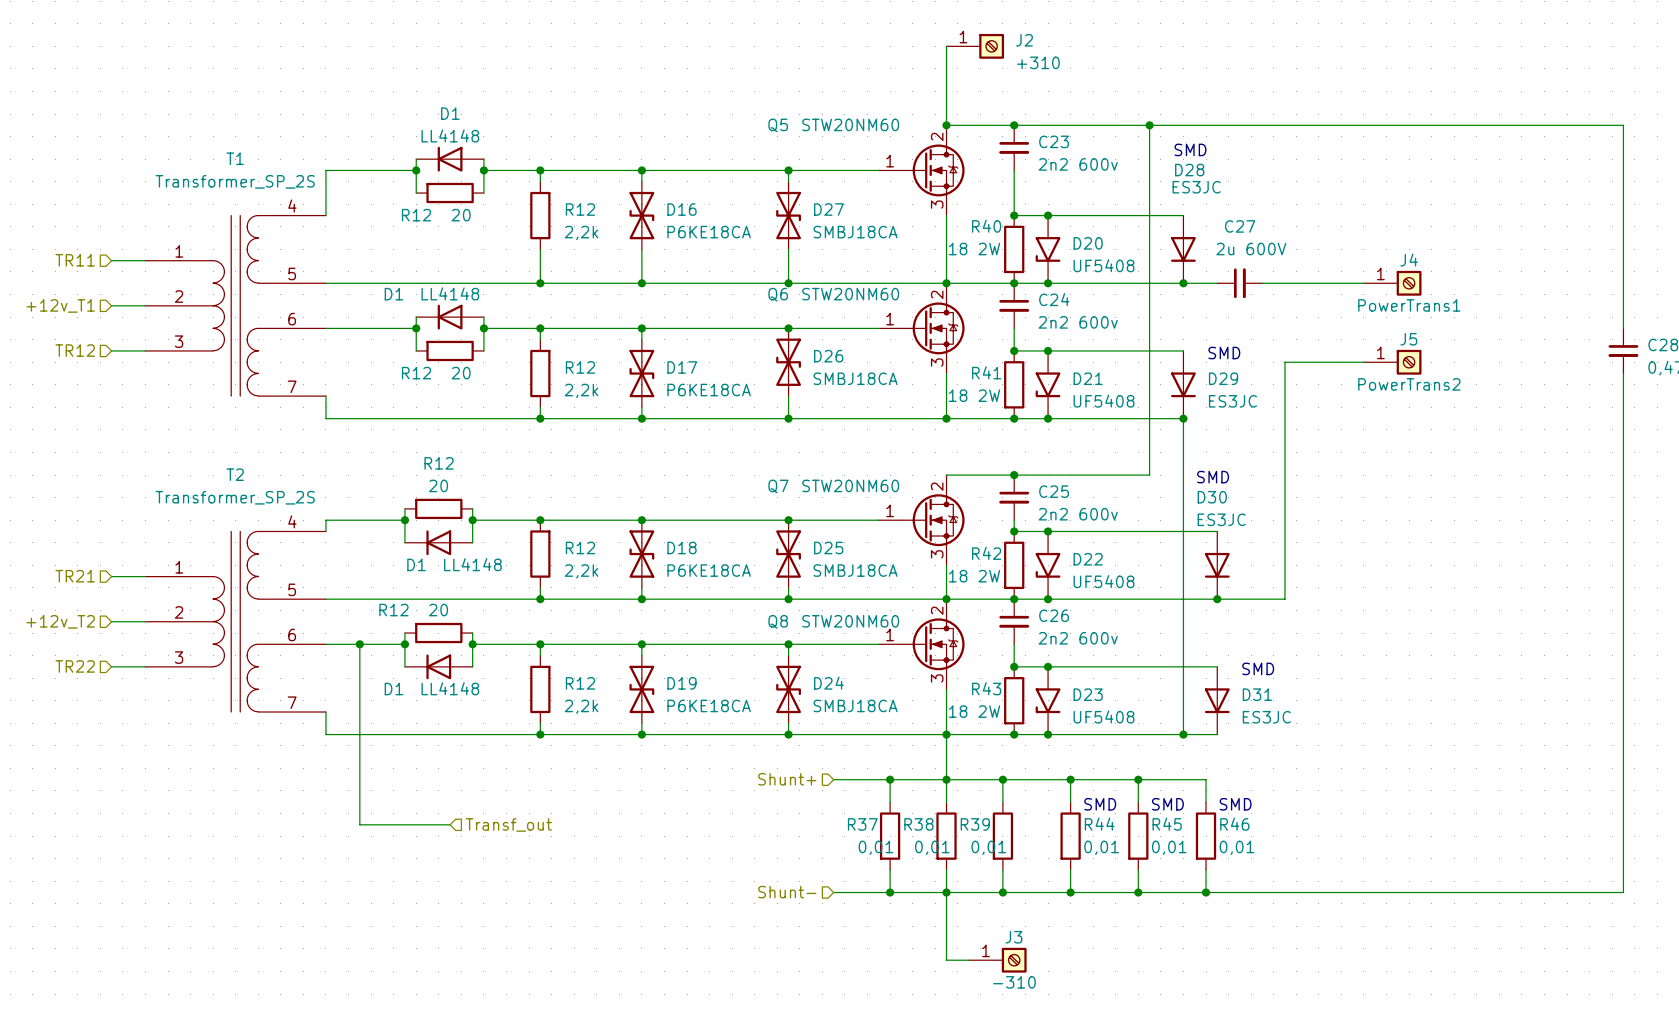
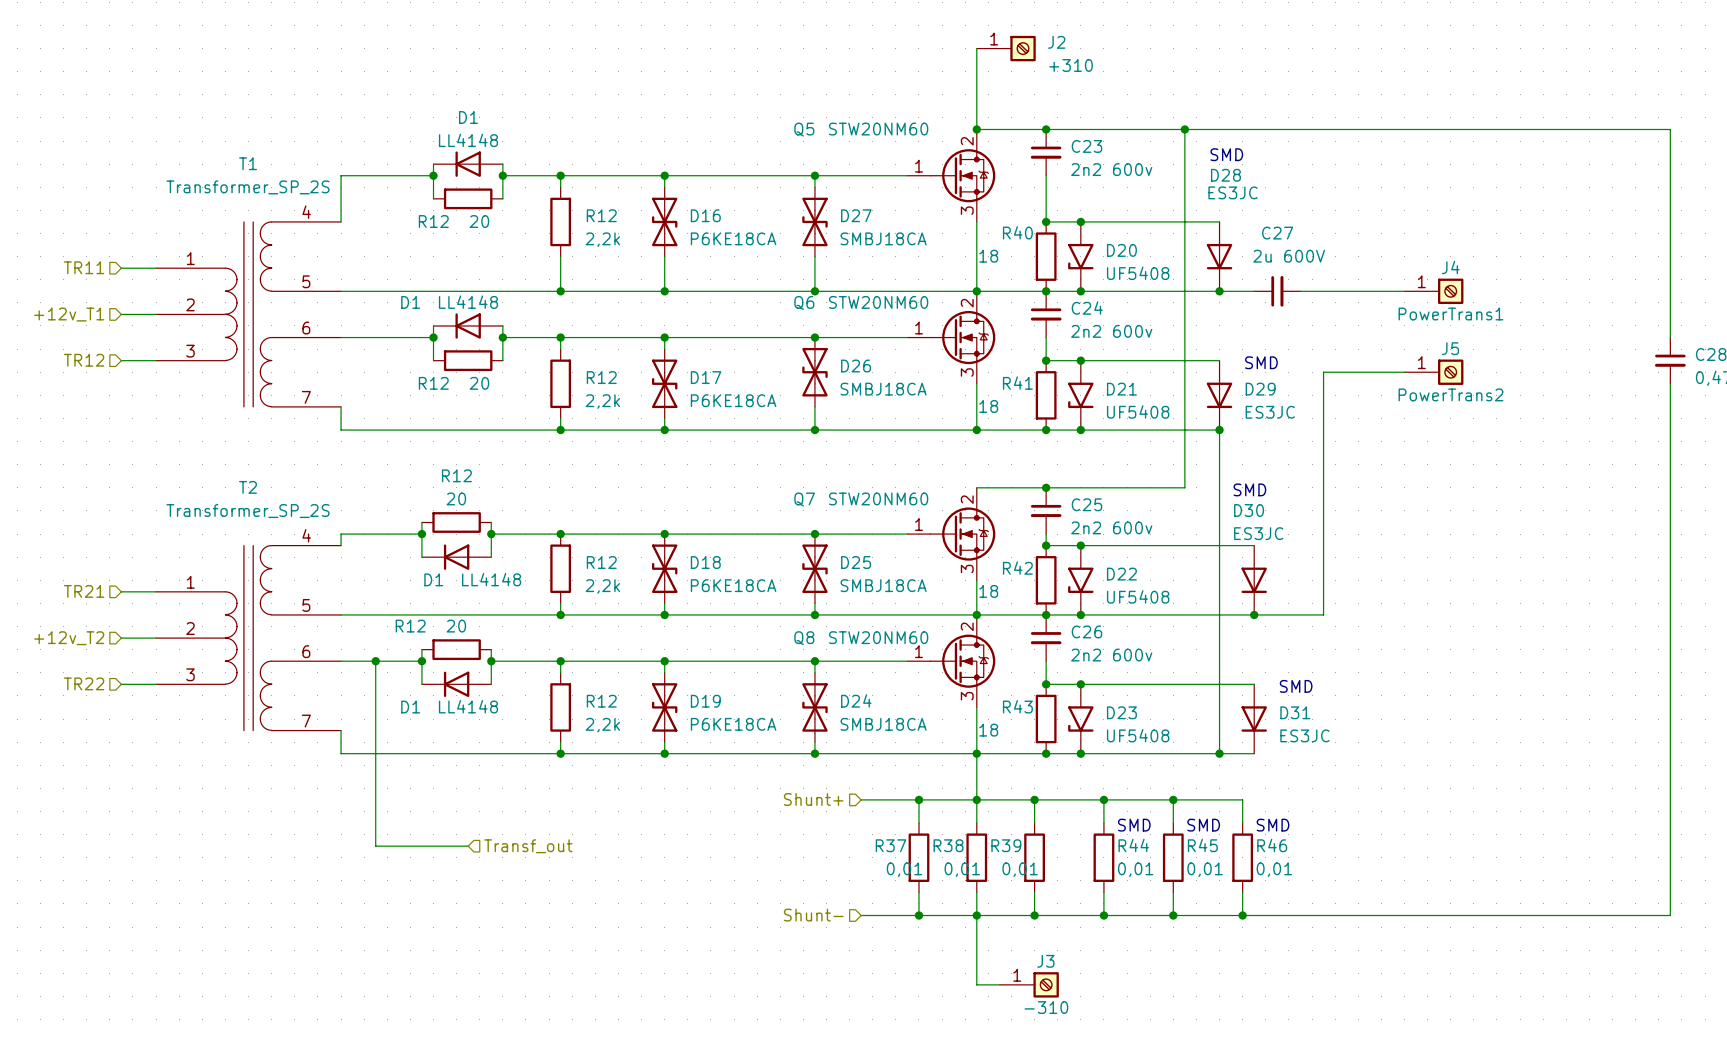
R40 value: 18 2W (974, 249) -> 18 (988, 256)
R41 value: 18 2W (974, 395) -> 18 (988, 406)
R42 value: 18 2W (974, 576) -> 18 (988, 591)
R43 value: 18 2W (974, 711) -> 18 (988, 730)

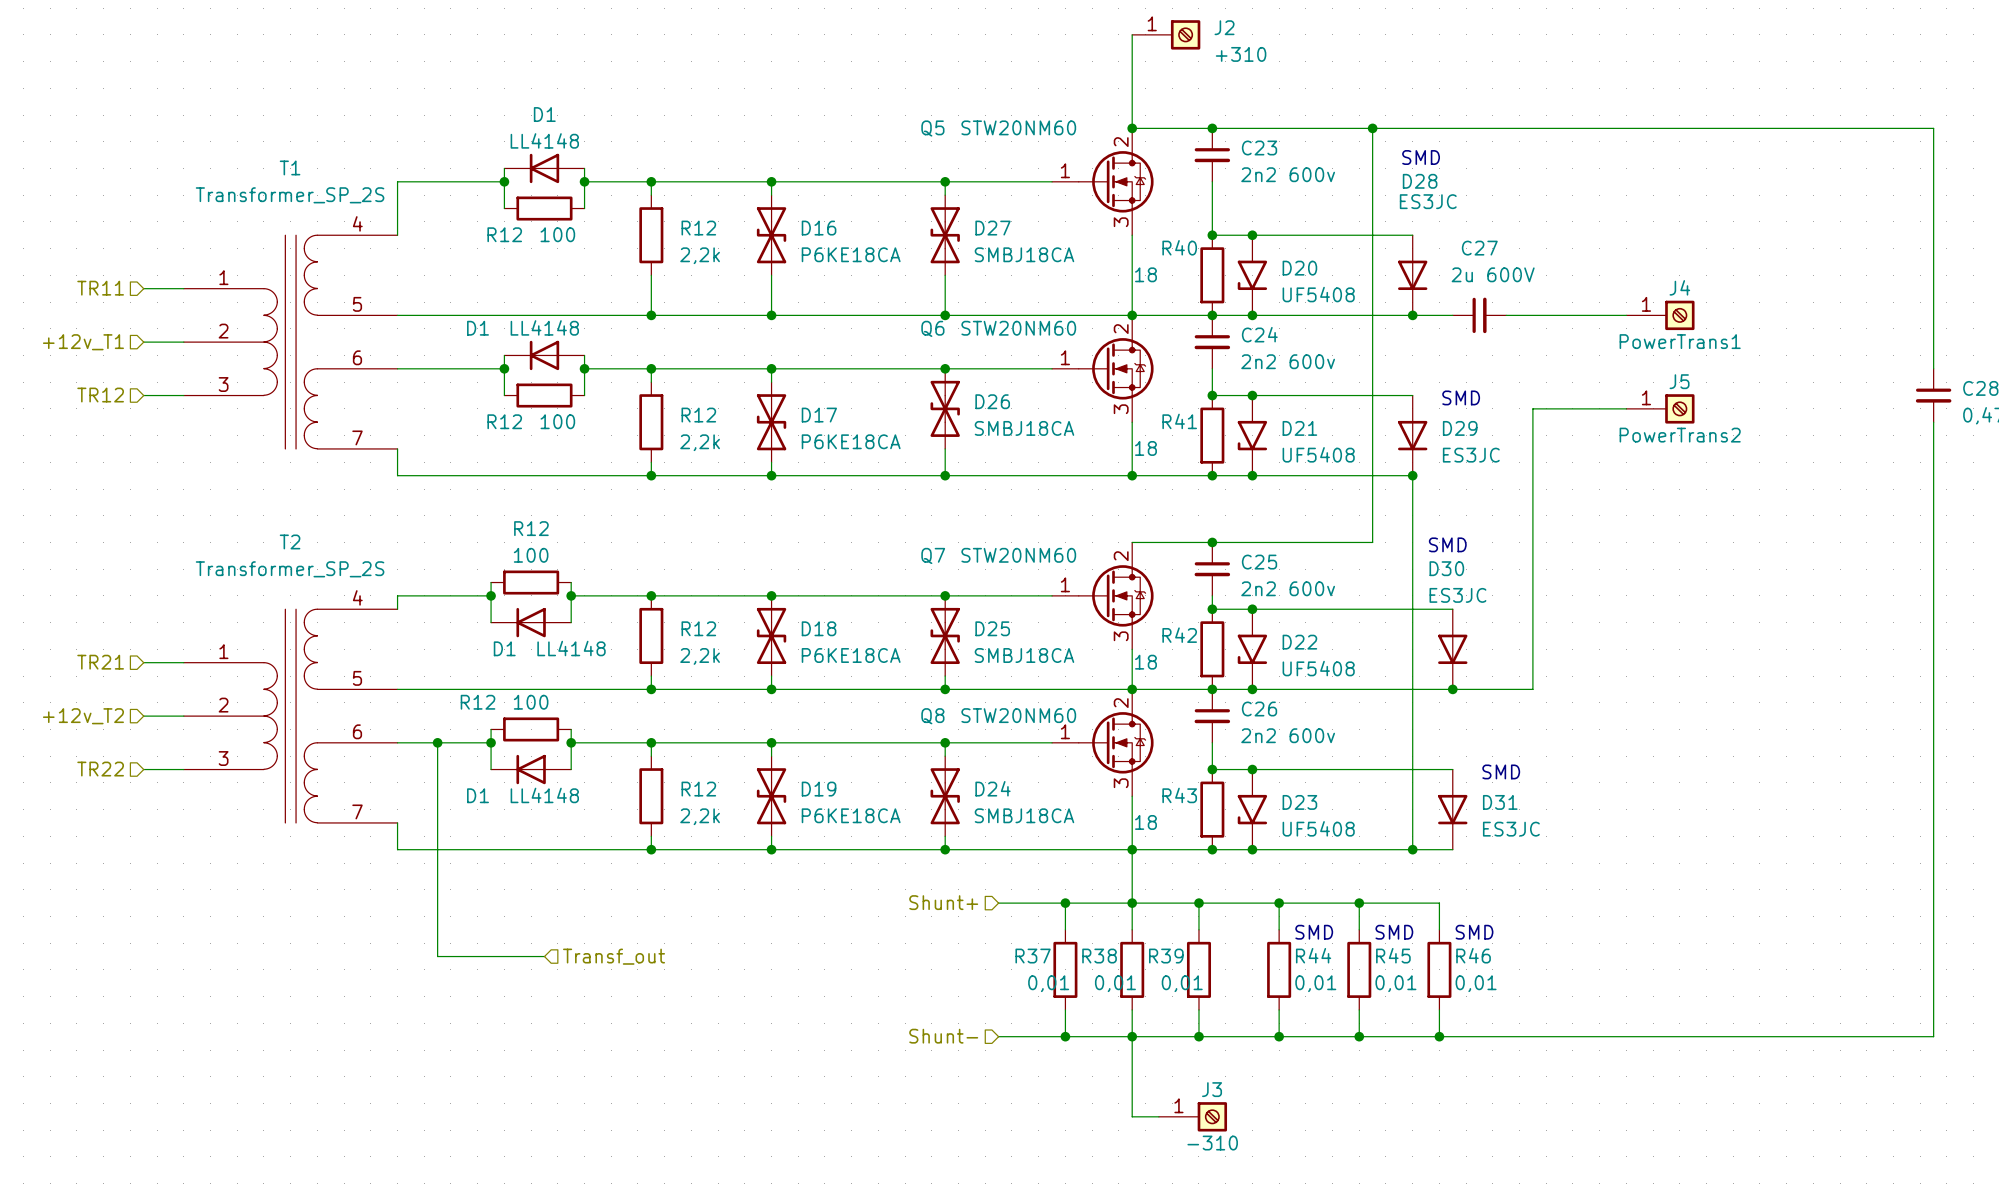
R12 value: 20 (479, 221) -> 100 (557, 234)
R12 value: 20 (479, 383) -> 100 (557, 421)
R12 value: 20 (456, 498) -> 100 (531, 555)
R12 value: 20 (456, 626) -> 100 (531, 702)

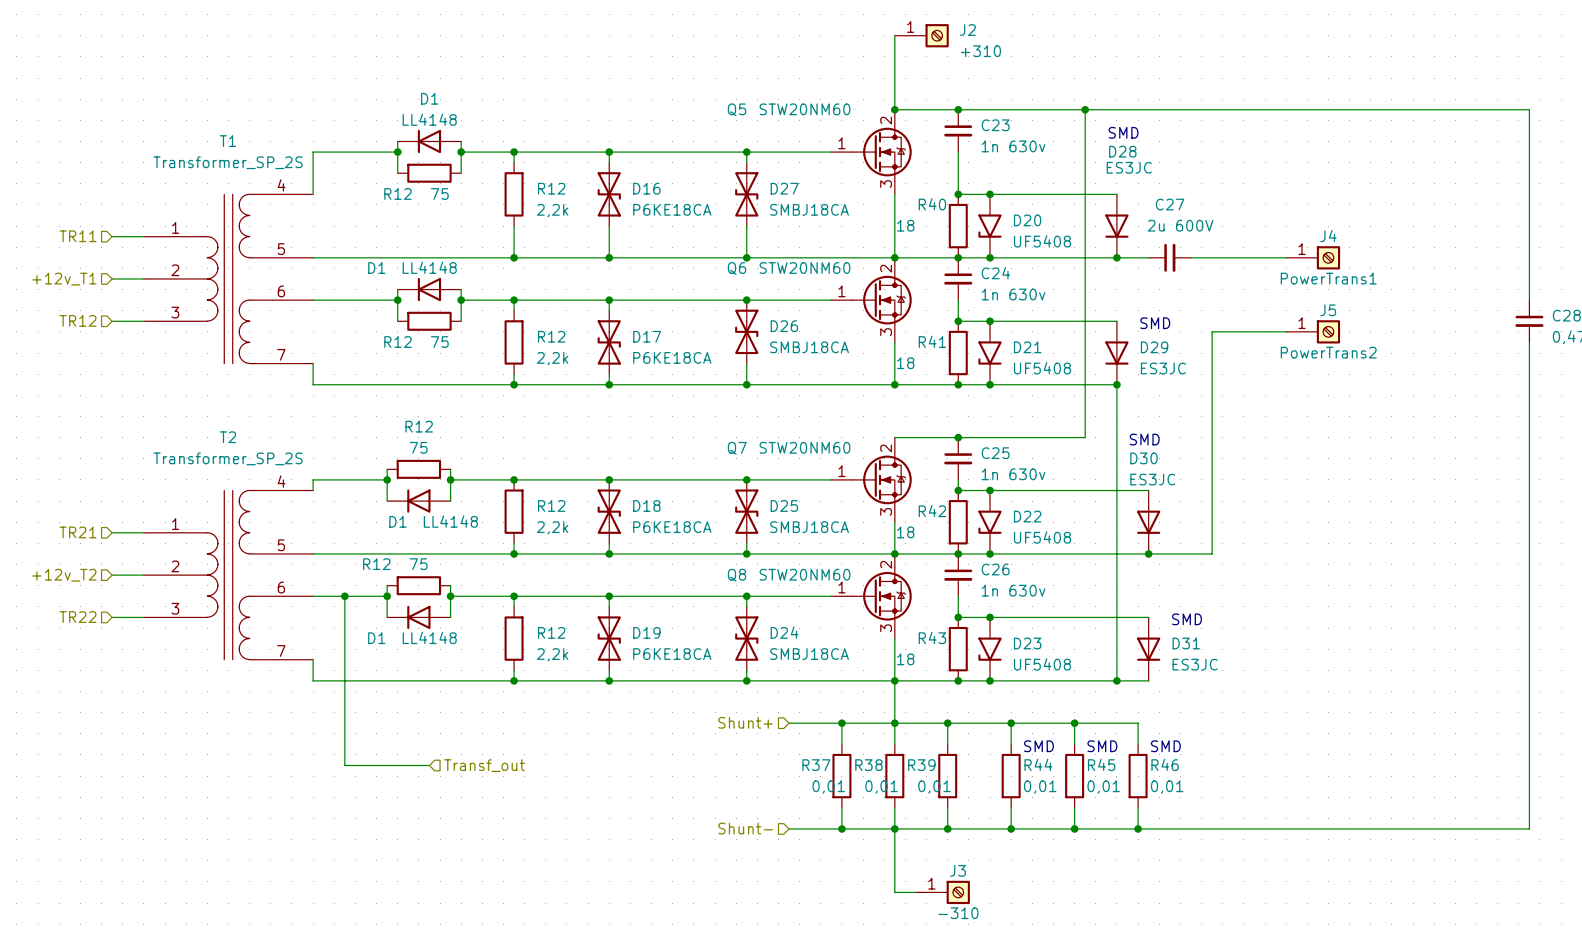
C23 value: 2n2 600v (1288, 174) -> 1n 630v (1013, 146)
R12 value: 100 (557, 234) -> 75 (439, 193)
C24 value: 2n2 600v (1288, 361) -> 1n 630v (1013, 294)
R12 value: 100 (557, 421) -> 75 (439, 342)
R12 value: 100 (531, 555) -> 75 (418, 447)
C25 value: 2n2 600v (1288, 588) -> 1n 630v (1013, 474)
R12 value: 100 (531, 702) -> 75 (418, 564)
C26 value: 2n2 600v (1288, 735) -> 1n 630v (1013, 590)

